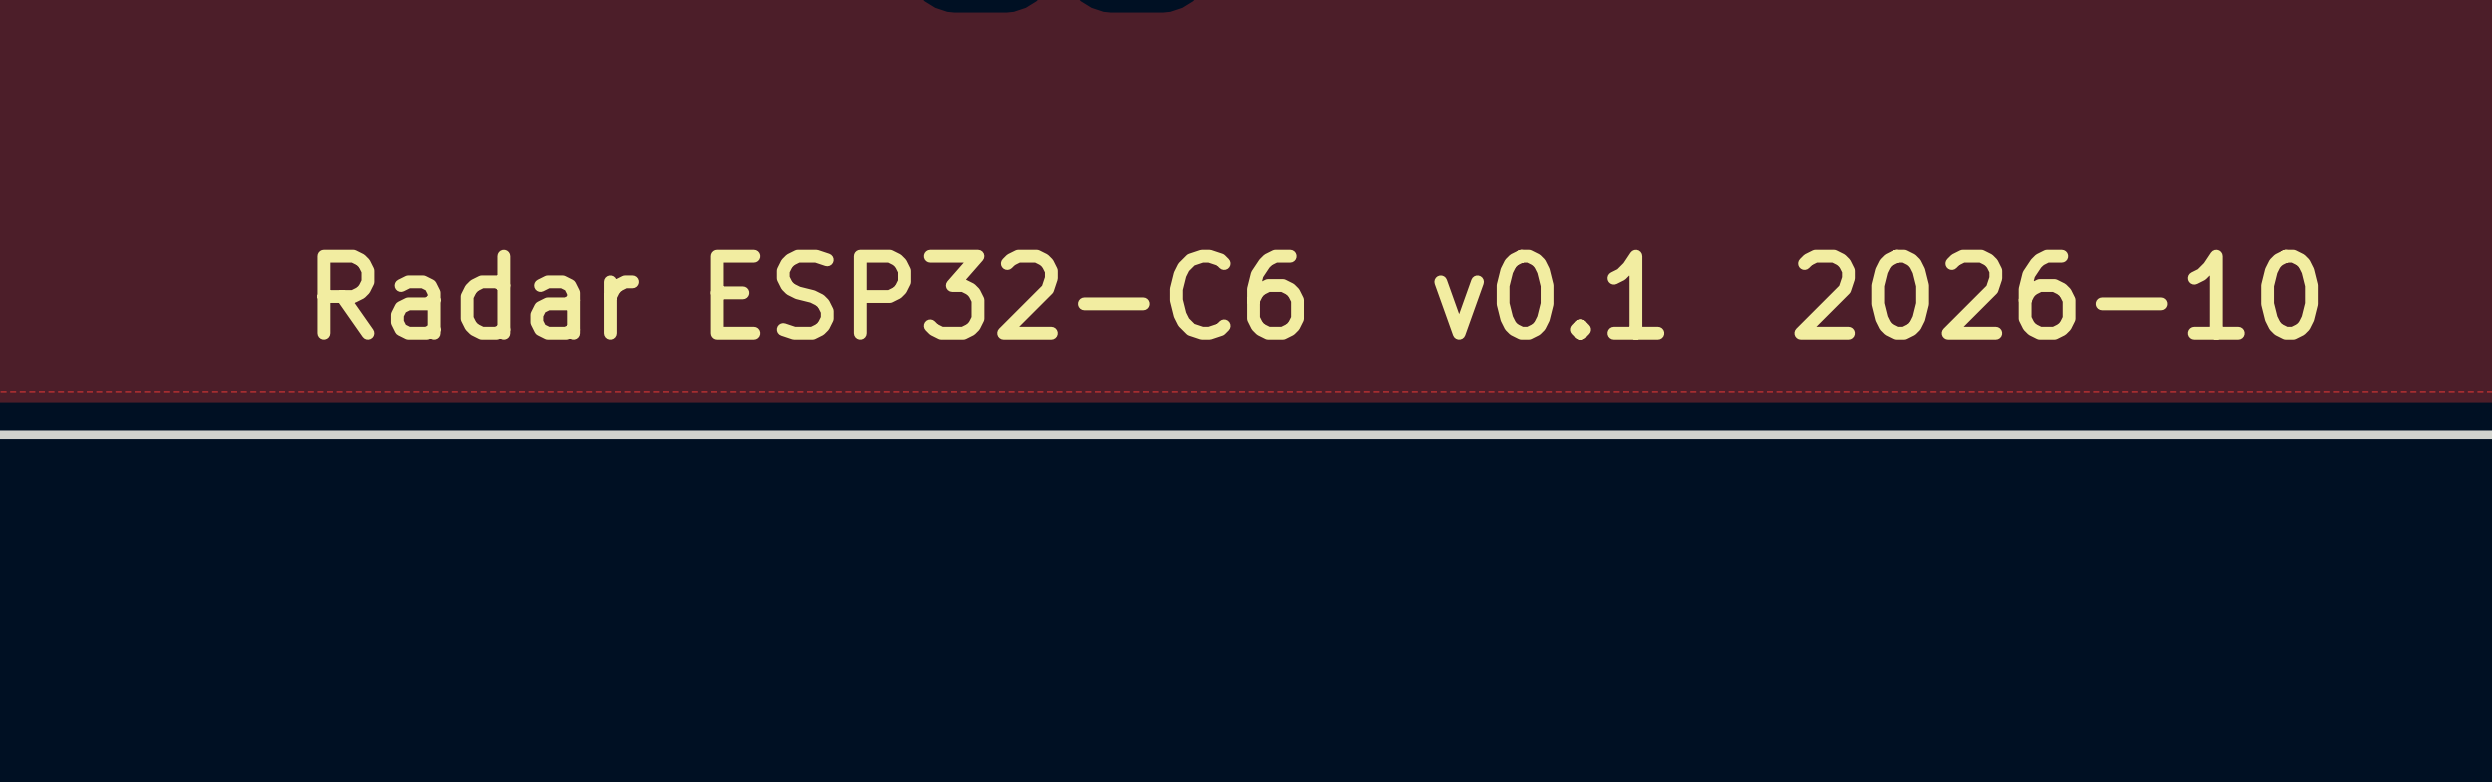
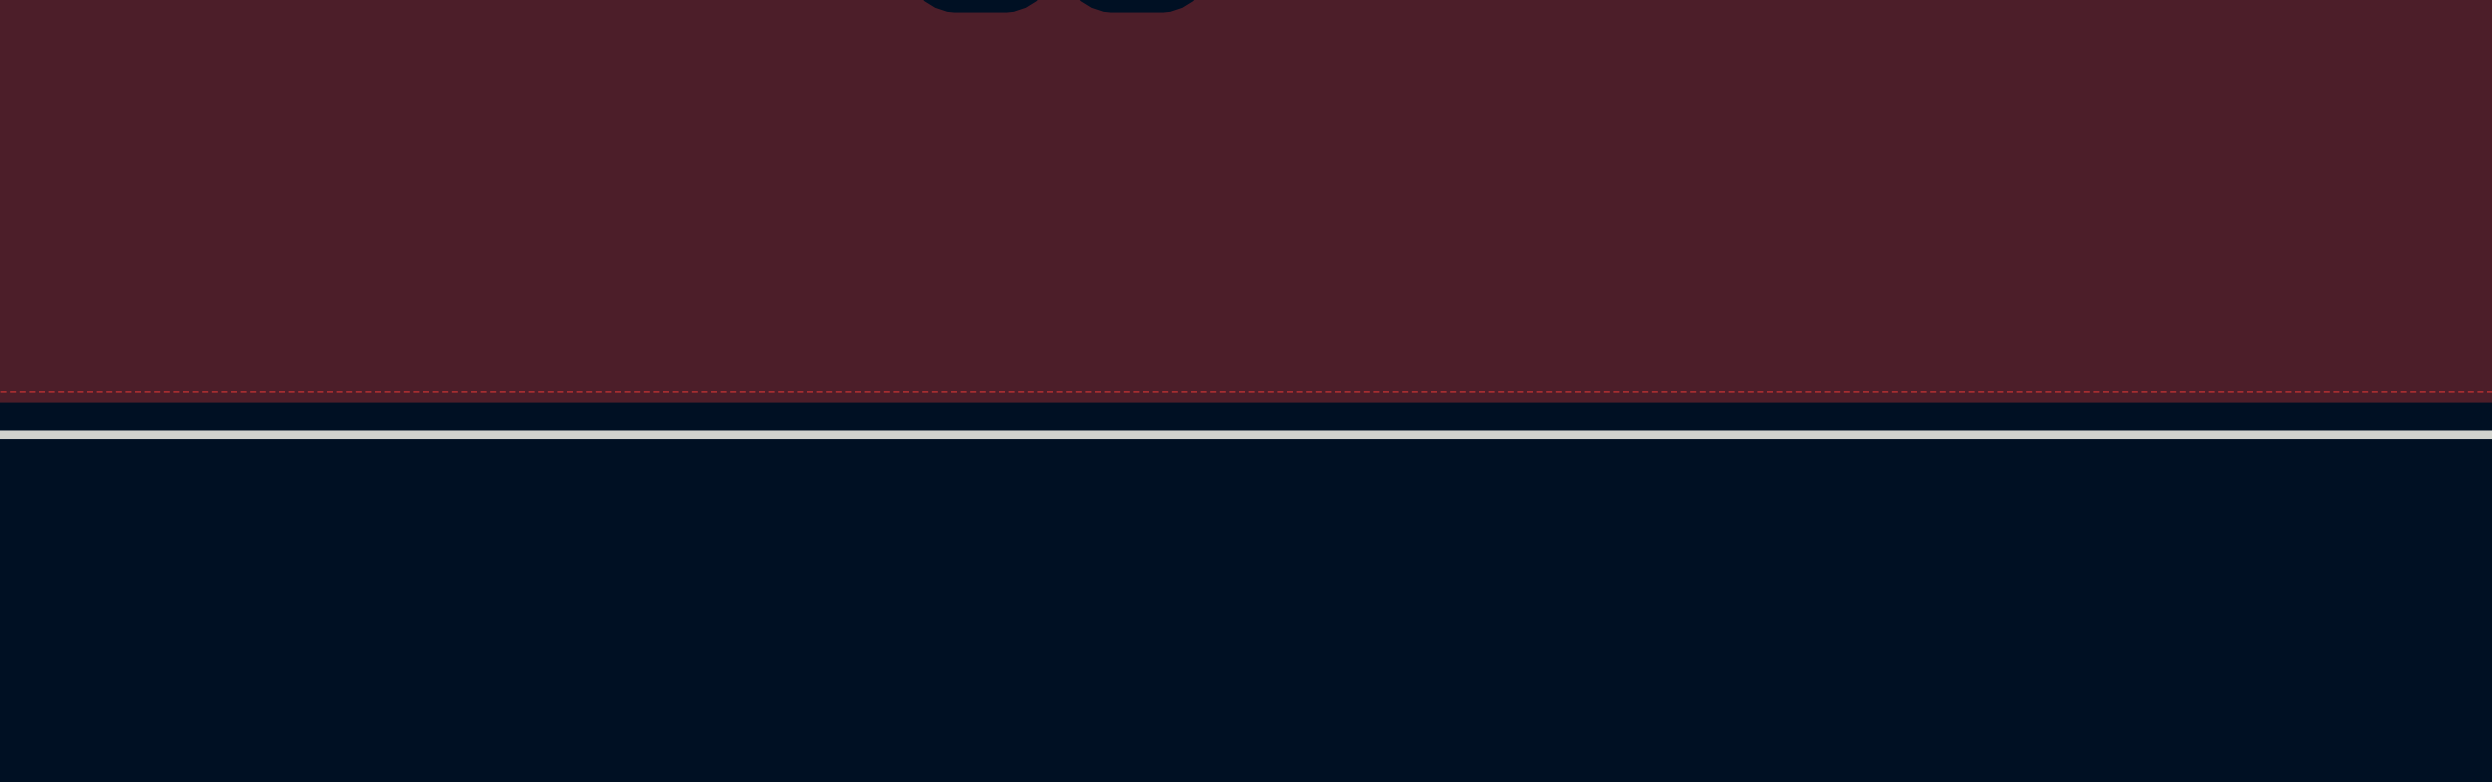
text: Radar ESP32-C6 v0.1 2026-10 (1317, 294) -> none

